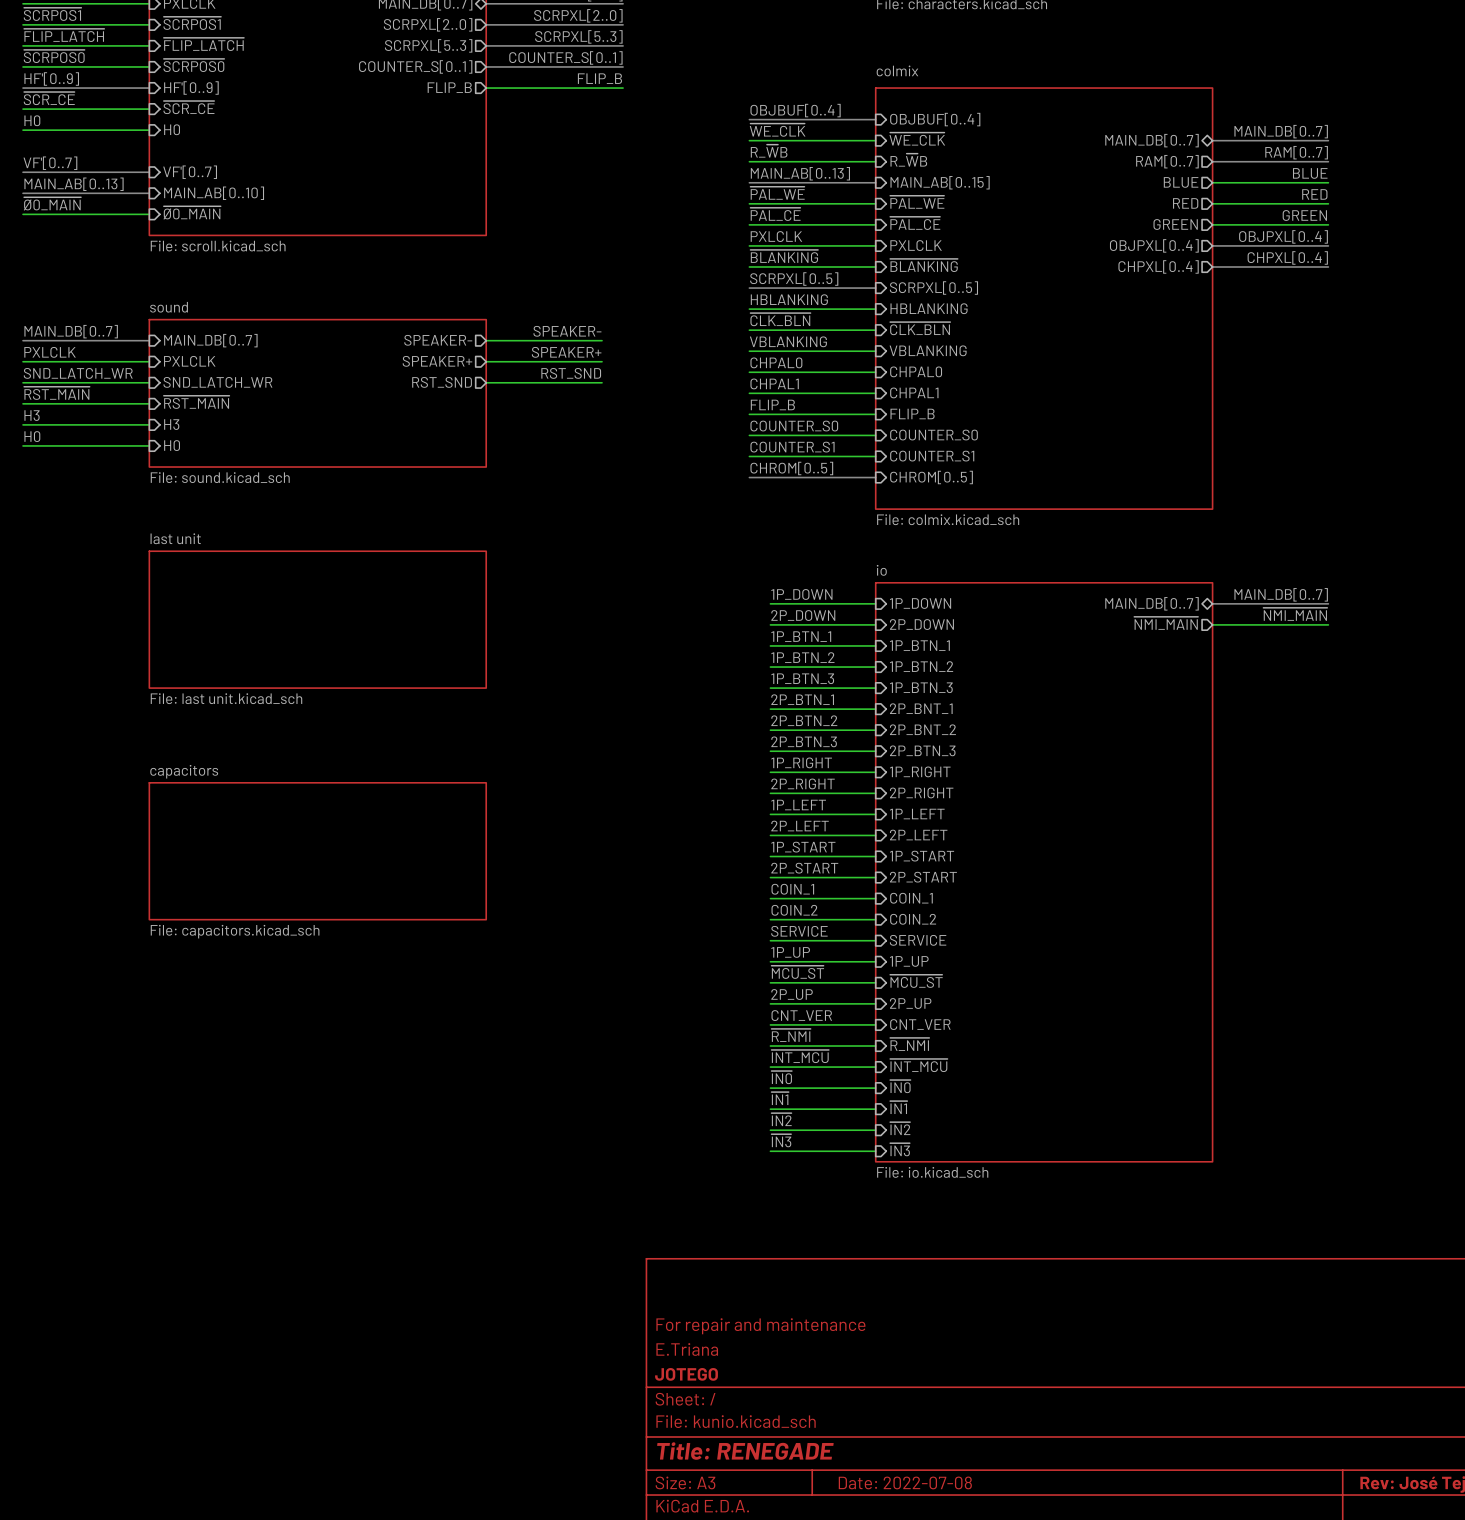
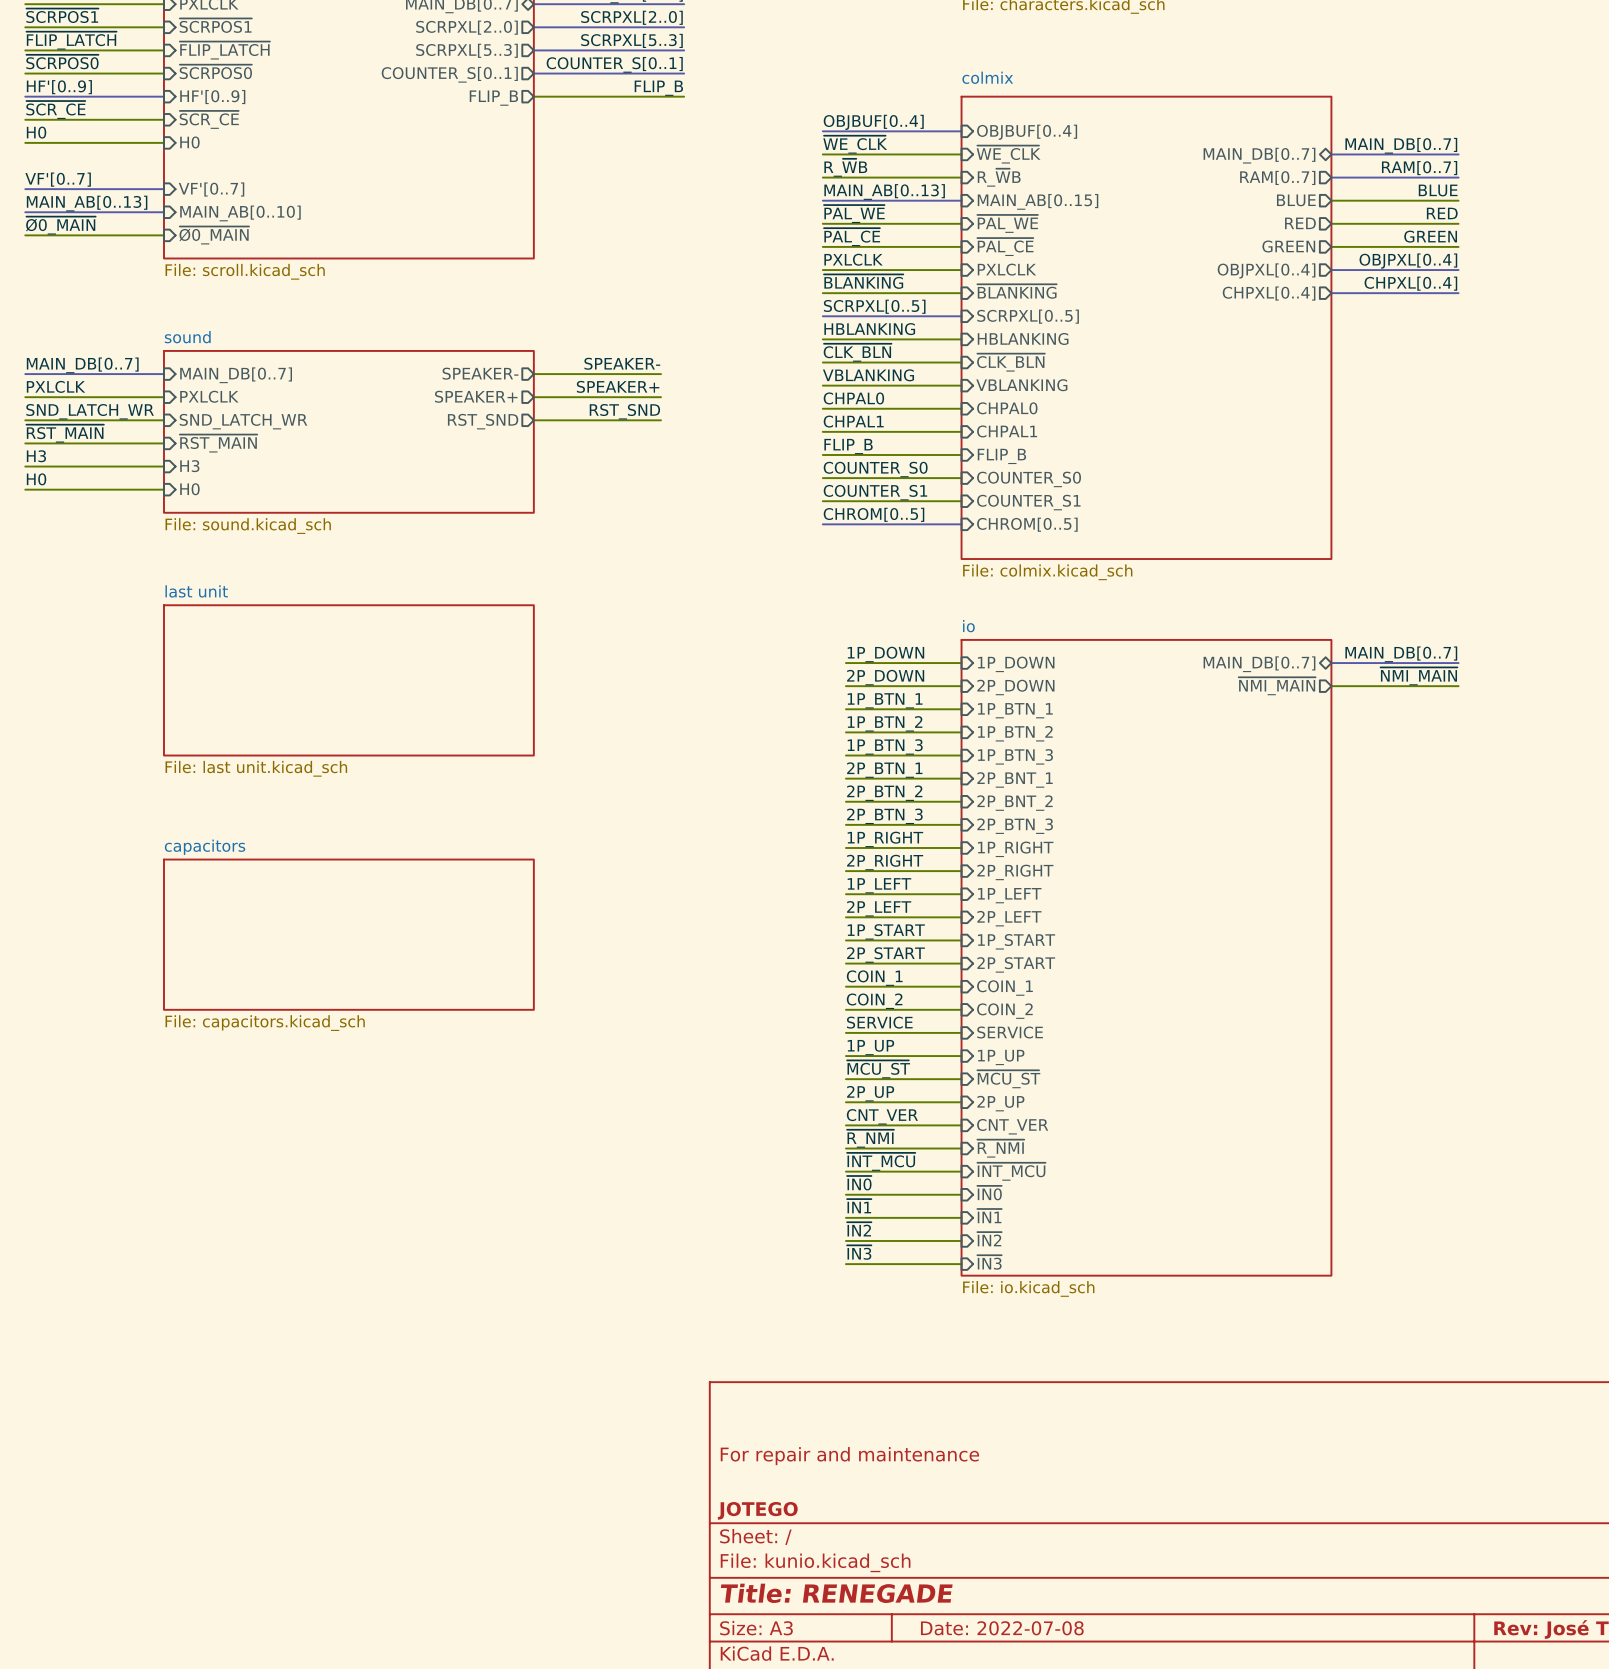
title block: E.Triana (687, 1349) -> none

